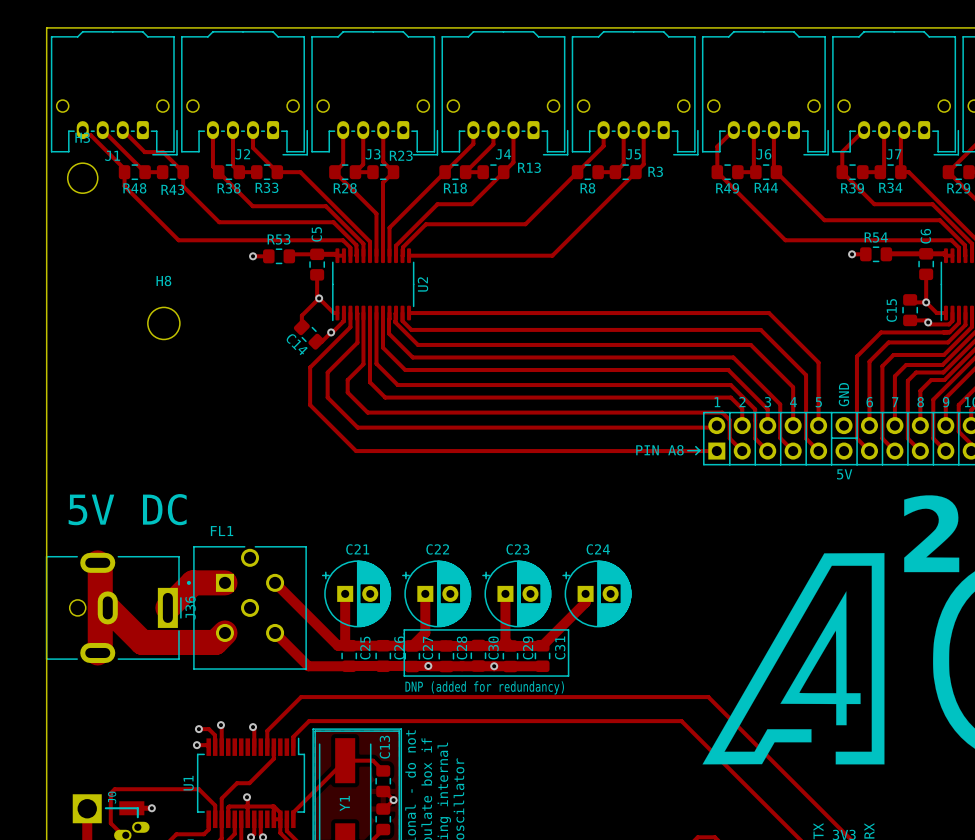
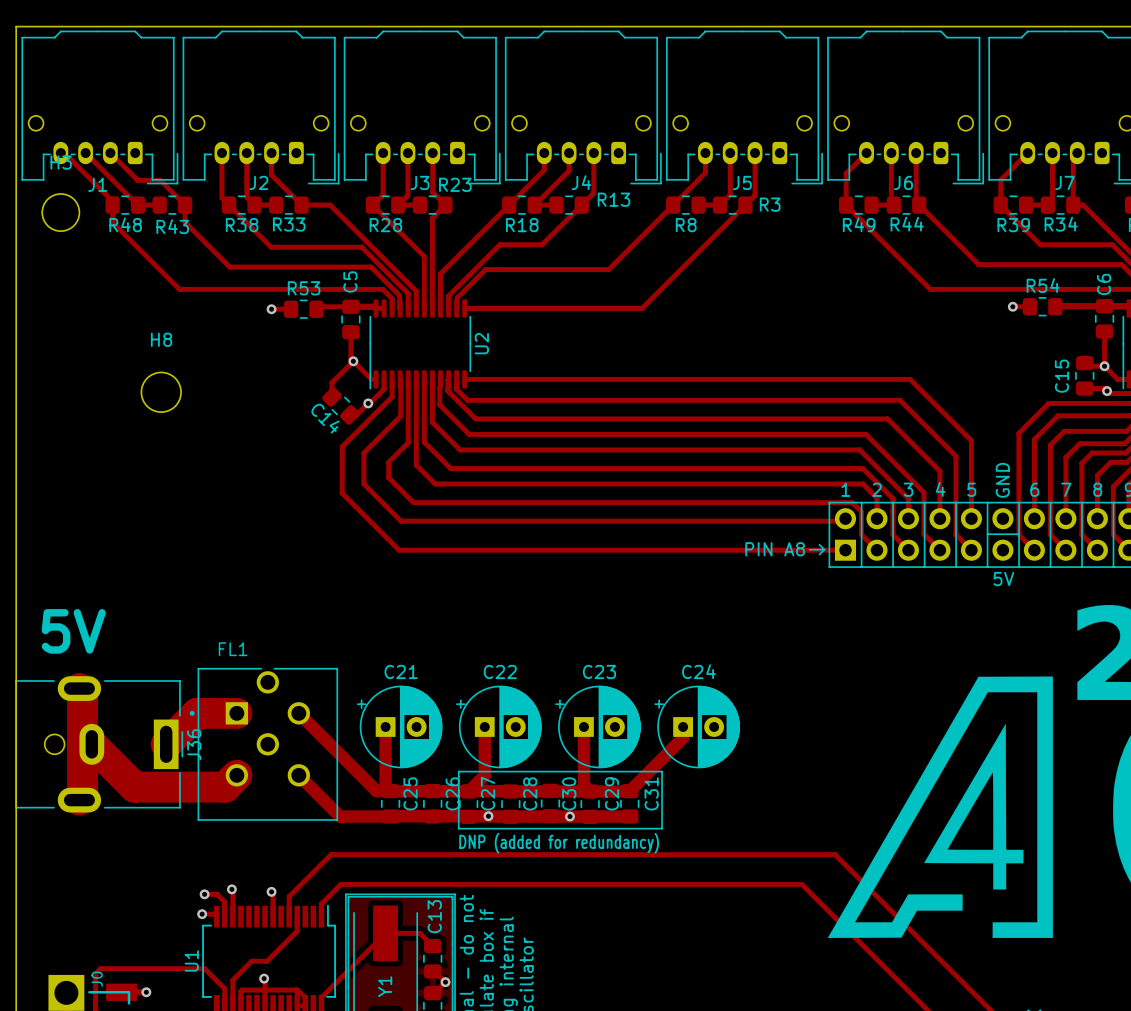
text: 5V DC (127, 509) -> none
text: none -> 5V (73, 631)

